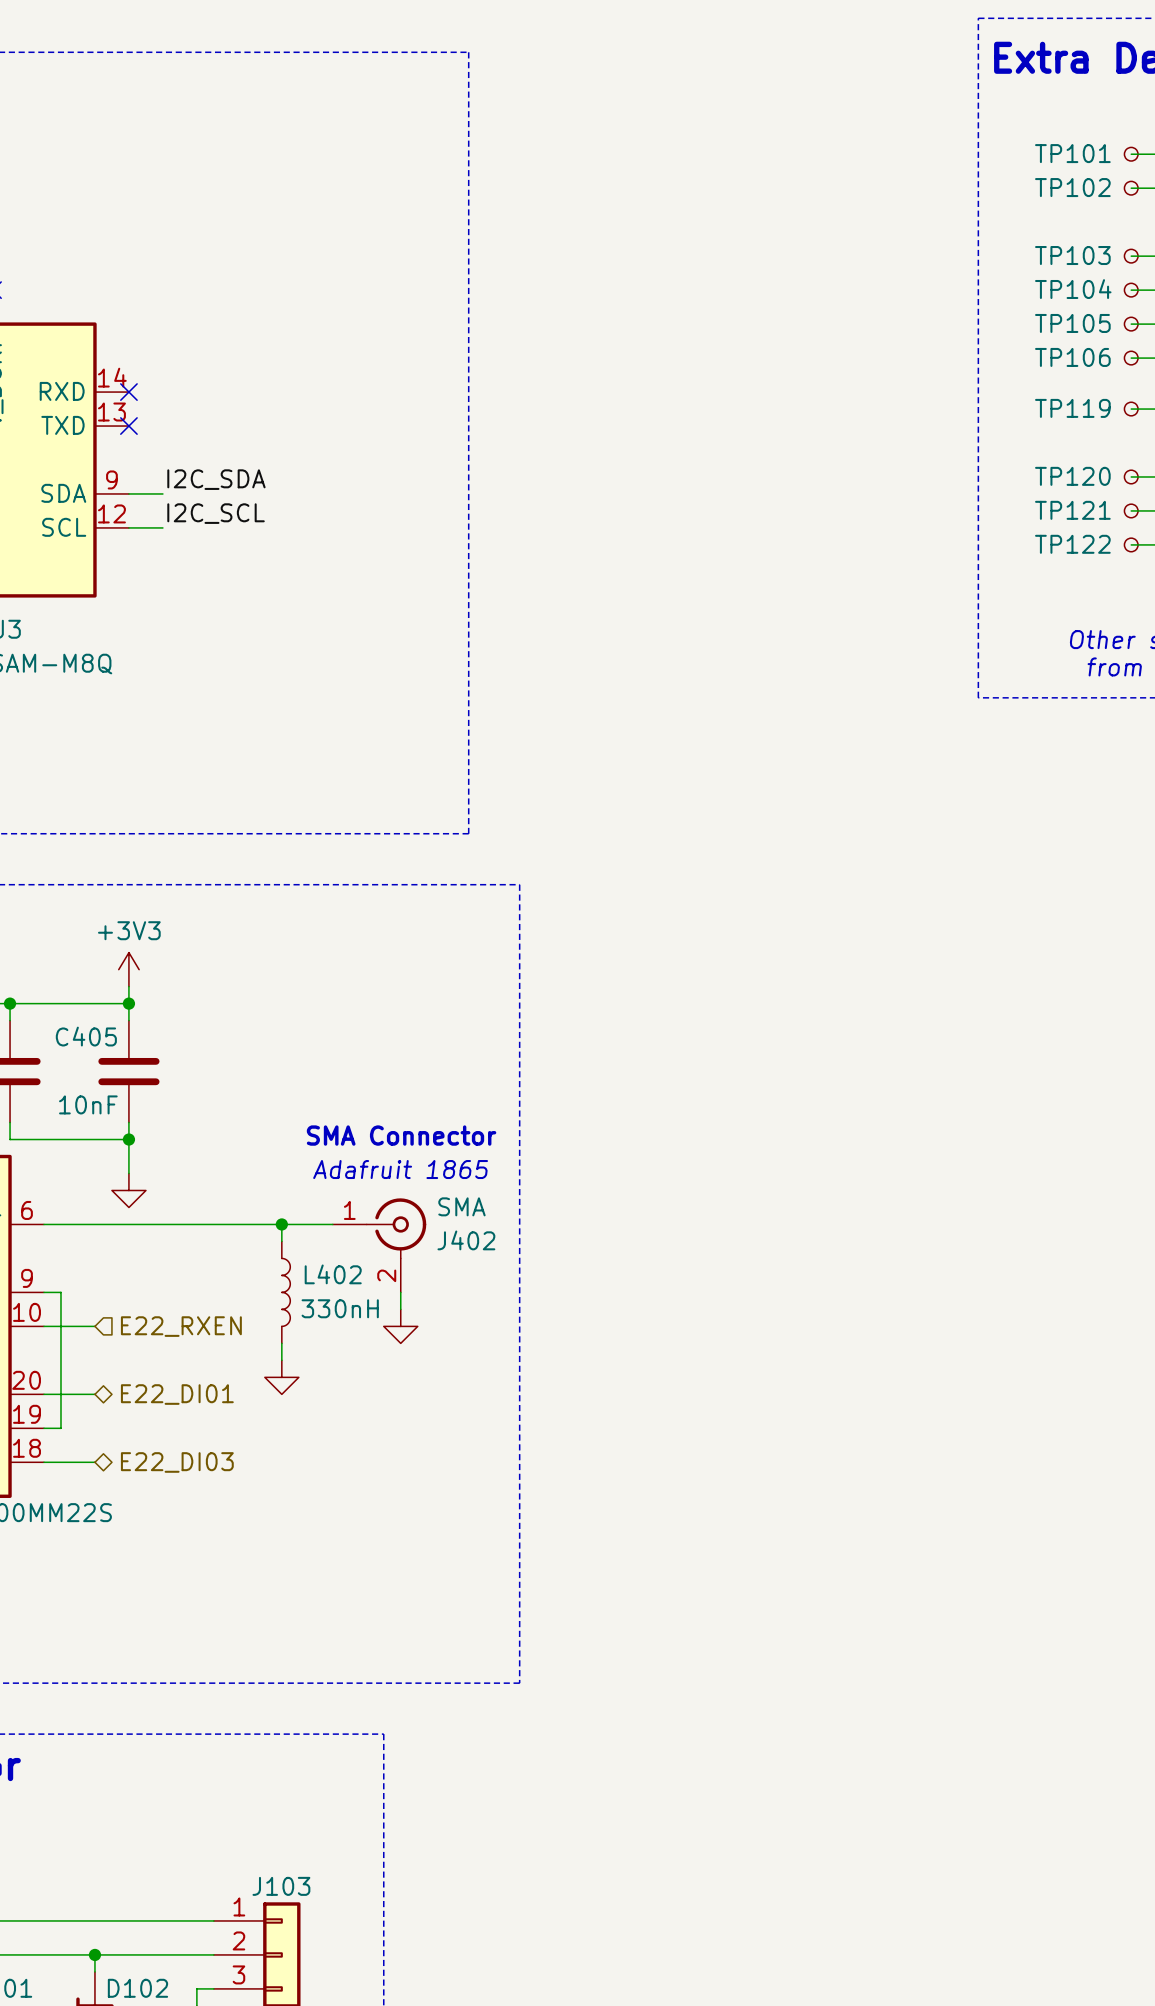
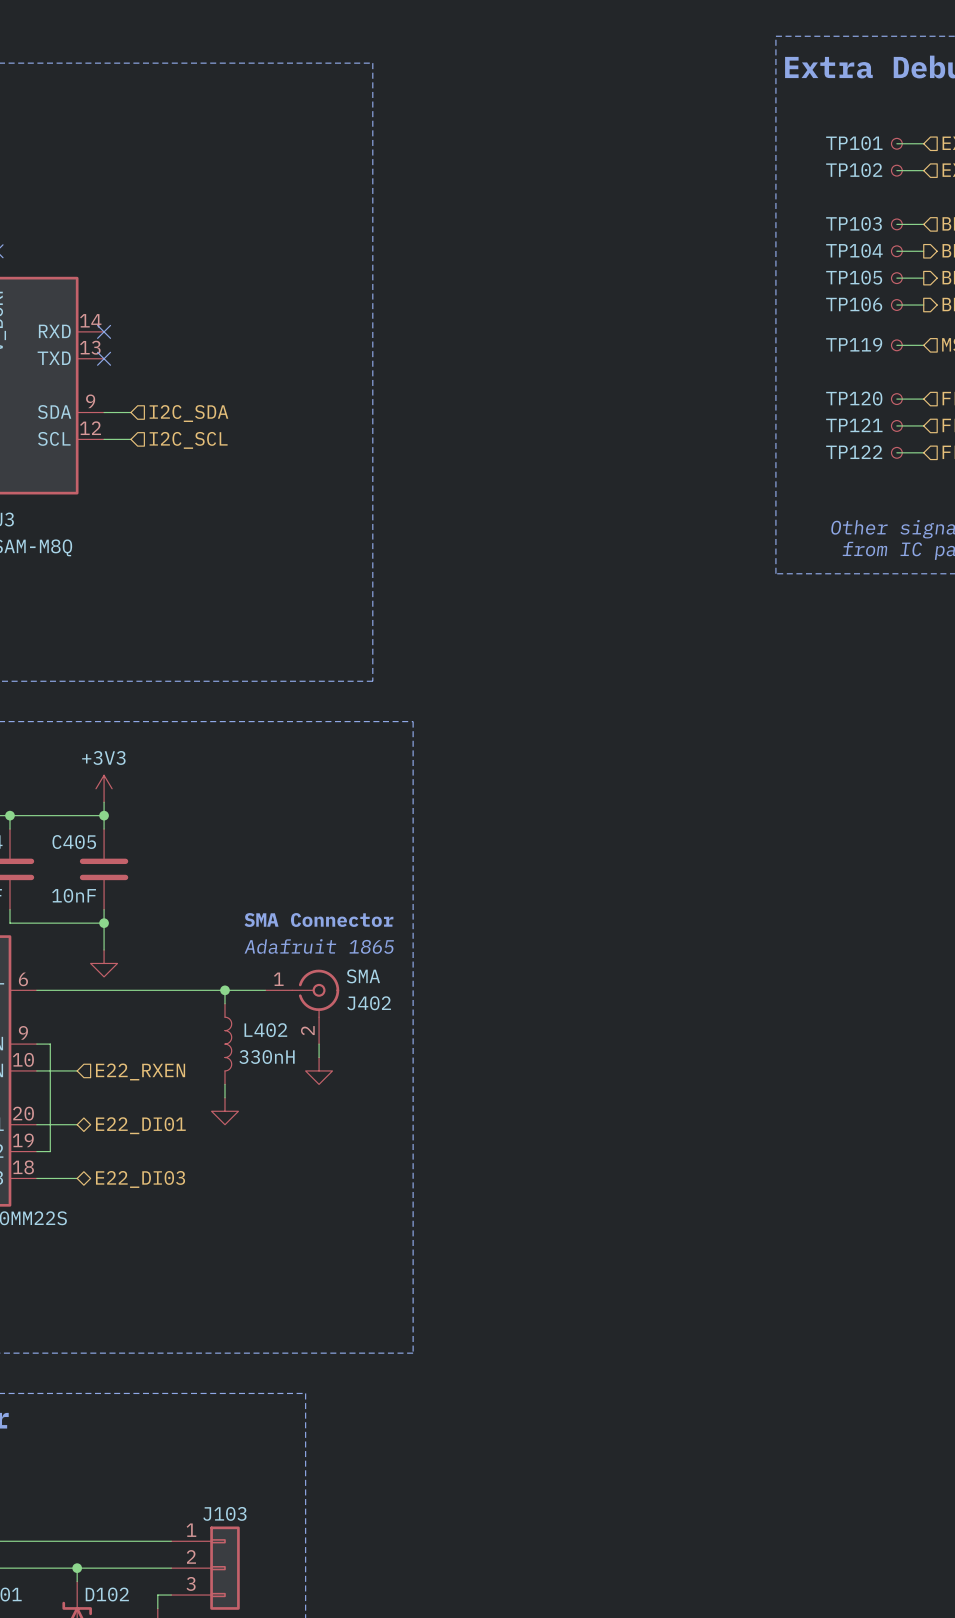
label: I2C_SDA (216, 479) -> none
hierarchical label: none -> I2C_SDA (188, 413)
label: I2C_SCL (216, 513) -> none
hierarchical label: none -> I2C_SCL (188, 440)

